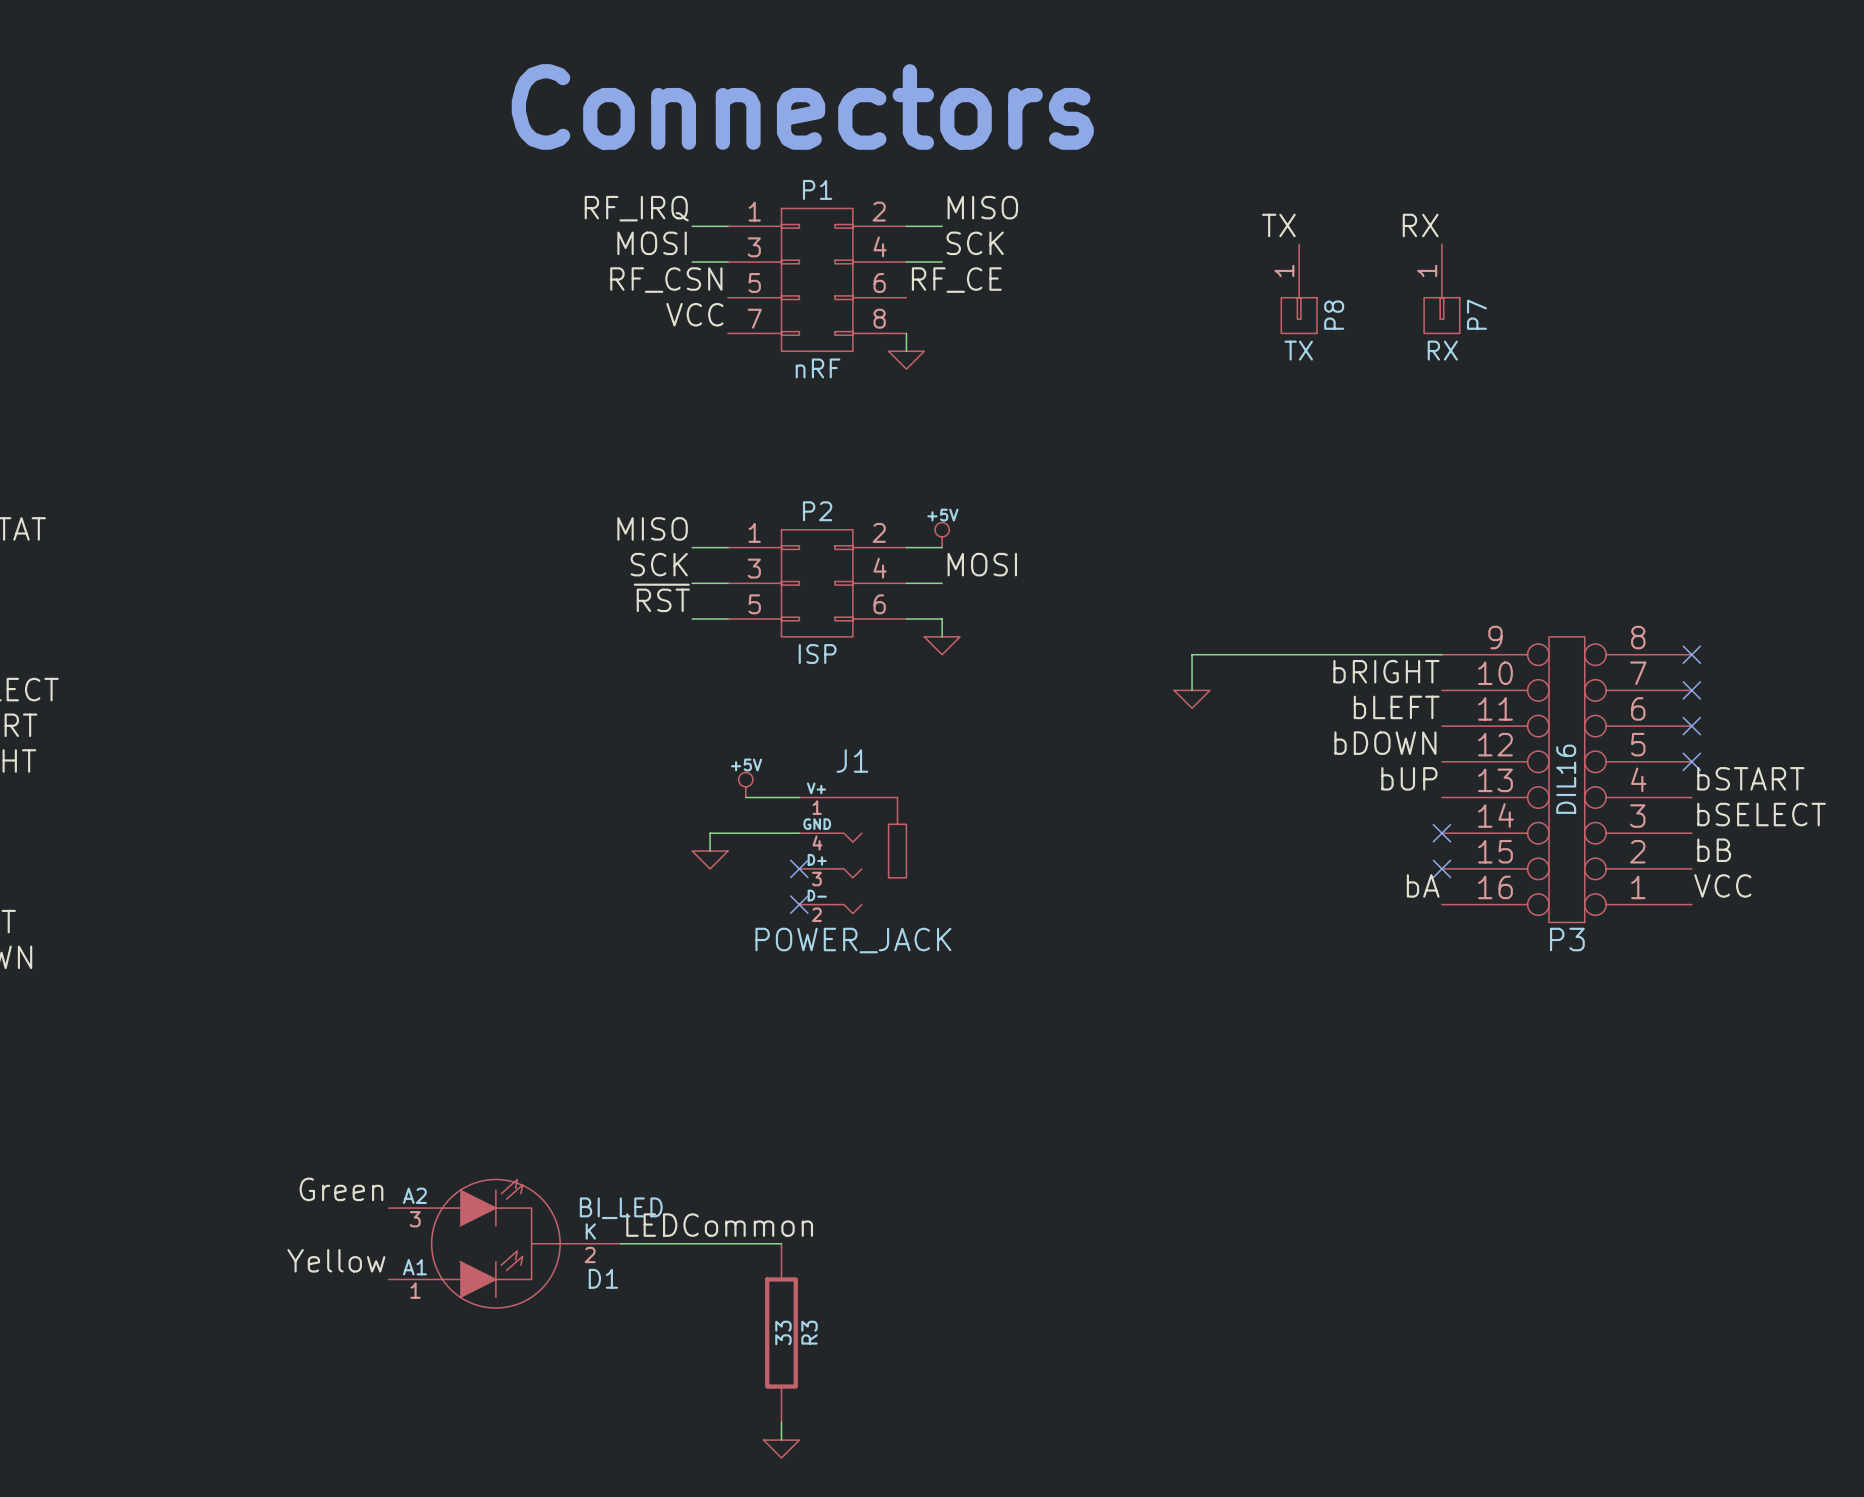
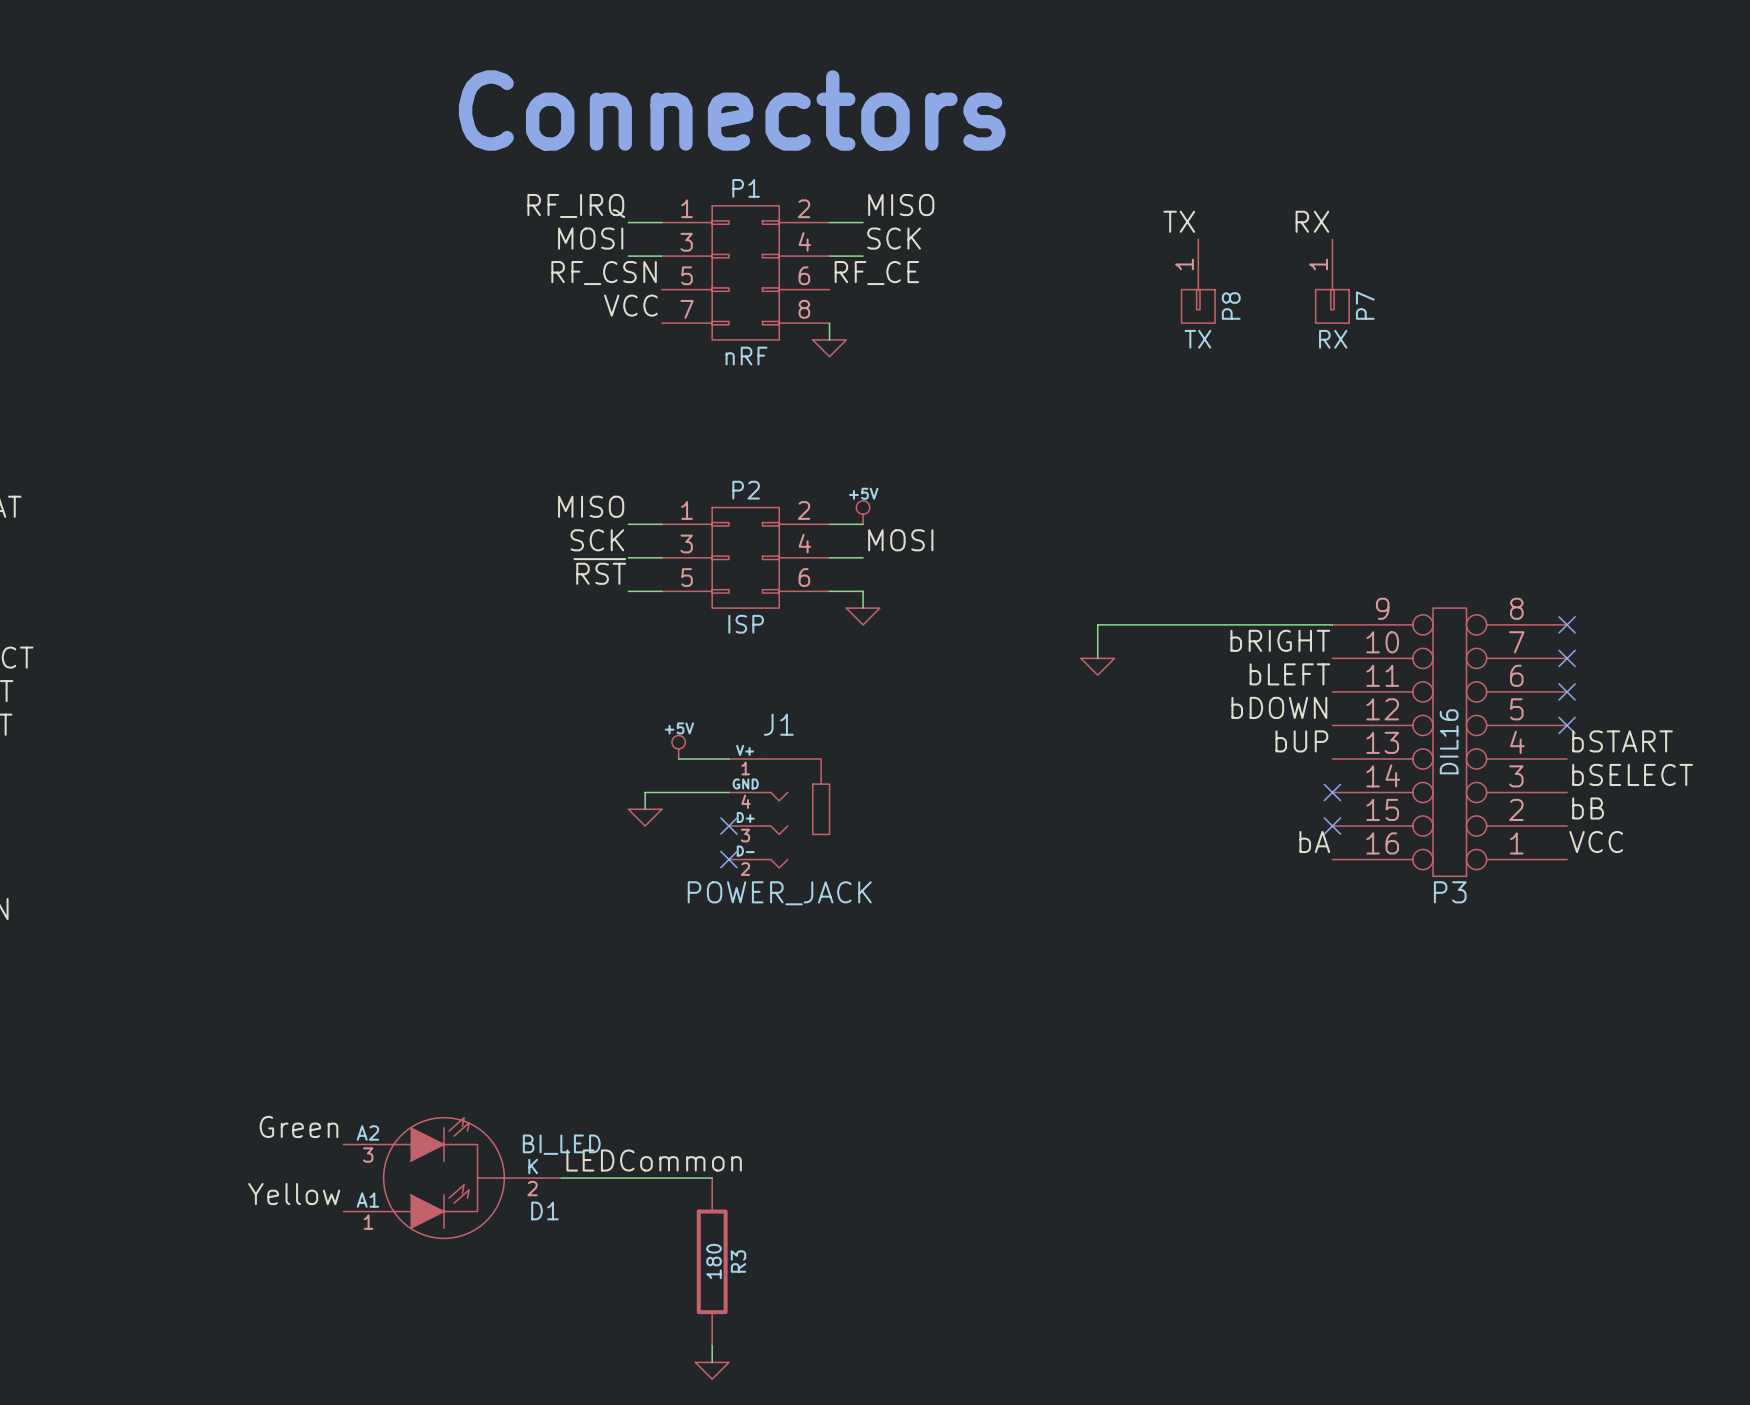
R3 value: 33 (783, 1332) -> 180 (714, 1261)

